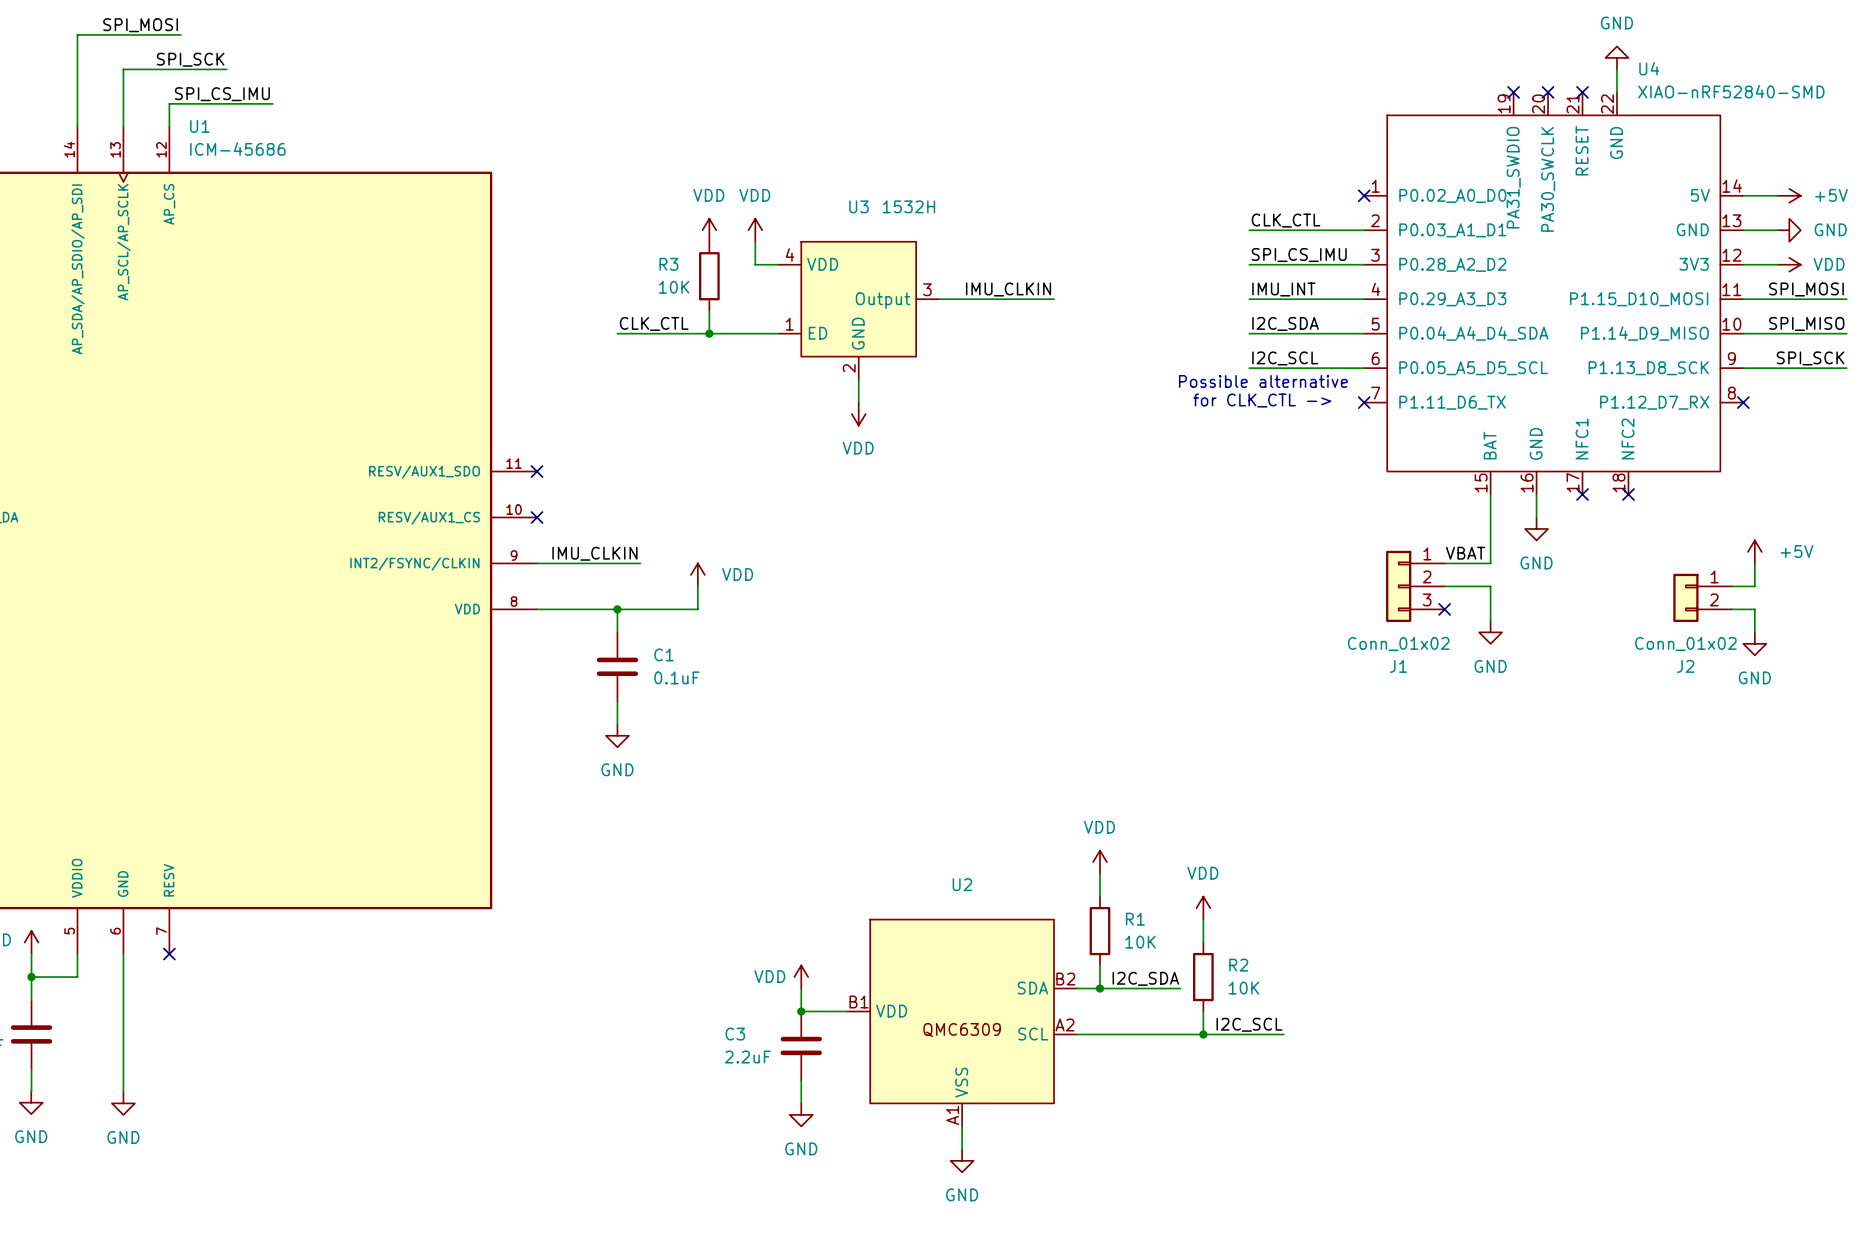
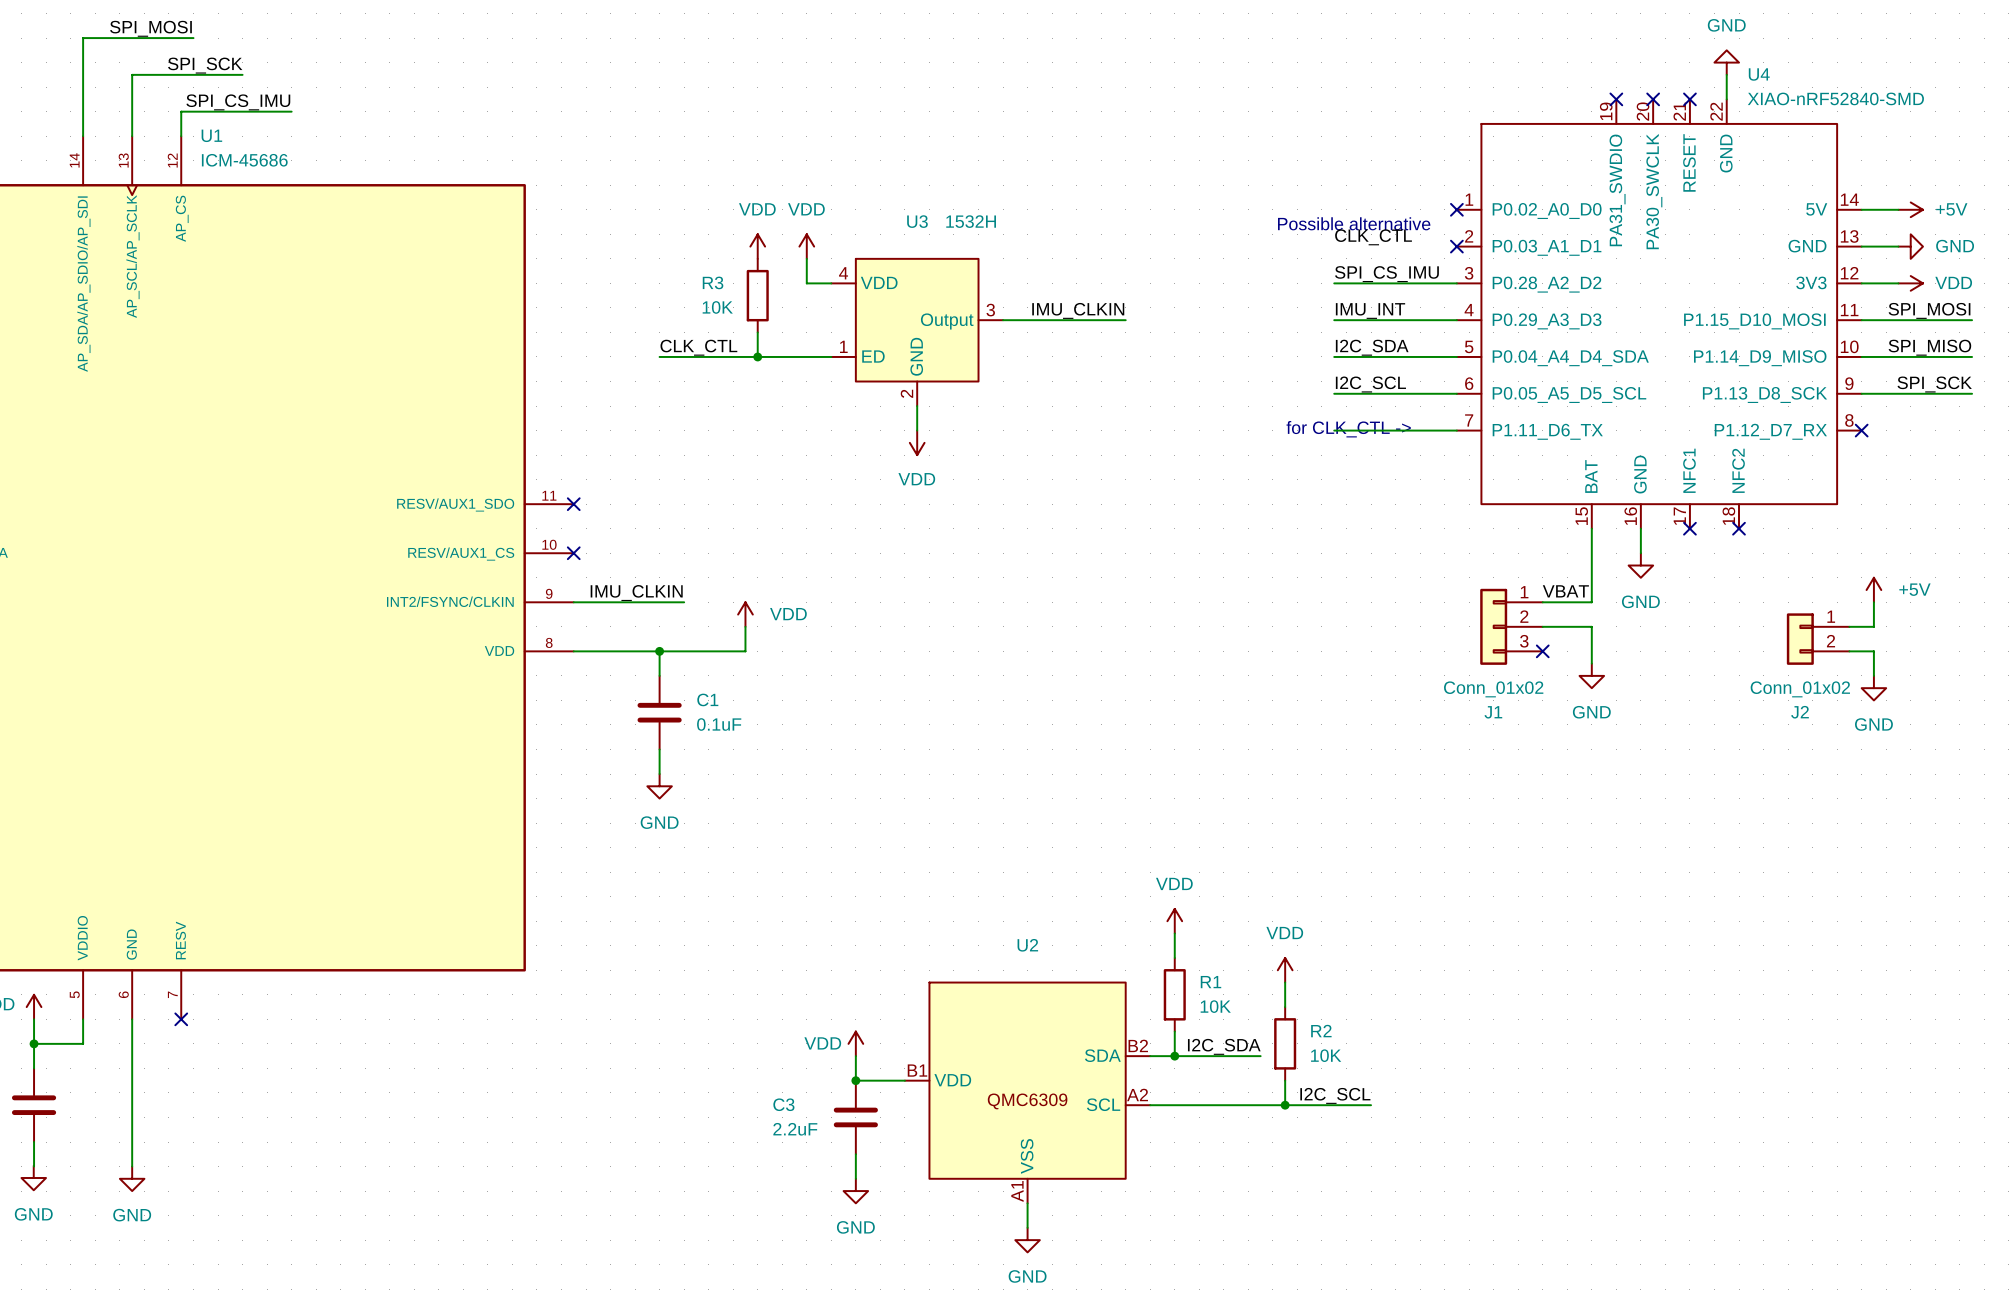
wire: (1249, 230) (1364, 230) -> (1334, 430) (1456, 430)
no-connect mark: none -> (1456, 246)
text position: Possible alternative (1263, 381) -> Possible alternative (1354, 223)
no-connect mark: (1364, 402) -> none

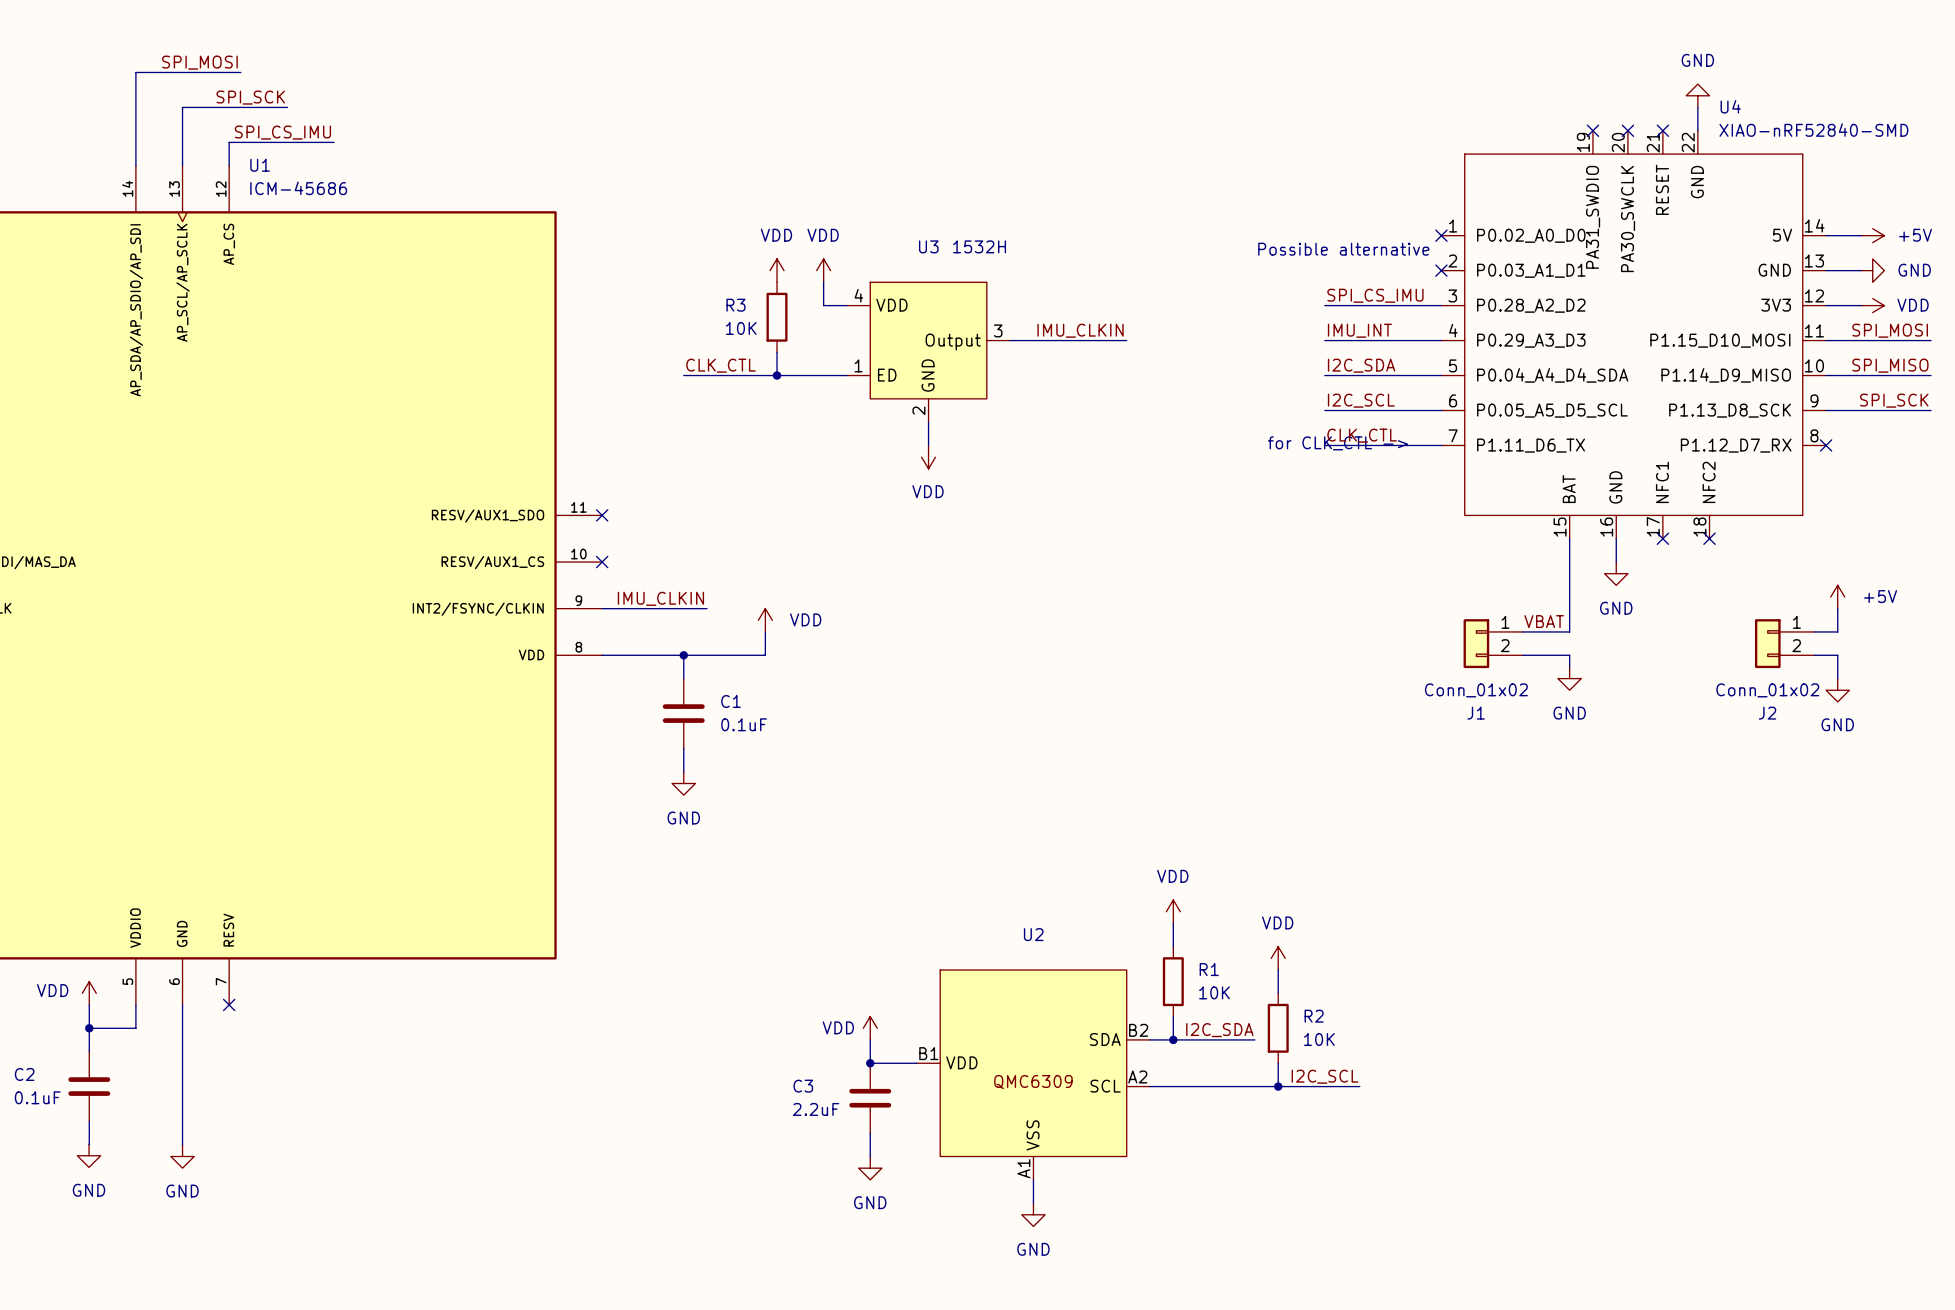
label position: CLK_CTL (1373, 237) -> CLK_CTL (1362, 435)
J1 symbol: [1480, 588, 1543, 665] -> [1463, 619, 1524, 669]
label position: VBAT (1565, 591) -> VBAT (1544, 621)
wire: (1542, 602) (1591, 602) -> (1523, 655) (1569, 655)
wire: (1591, 626) (1591, 651) -> (1569, 631) (1569, 608)
no-connect mark: (1542, 651) -> none

